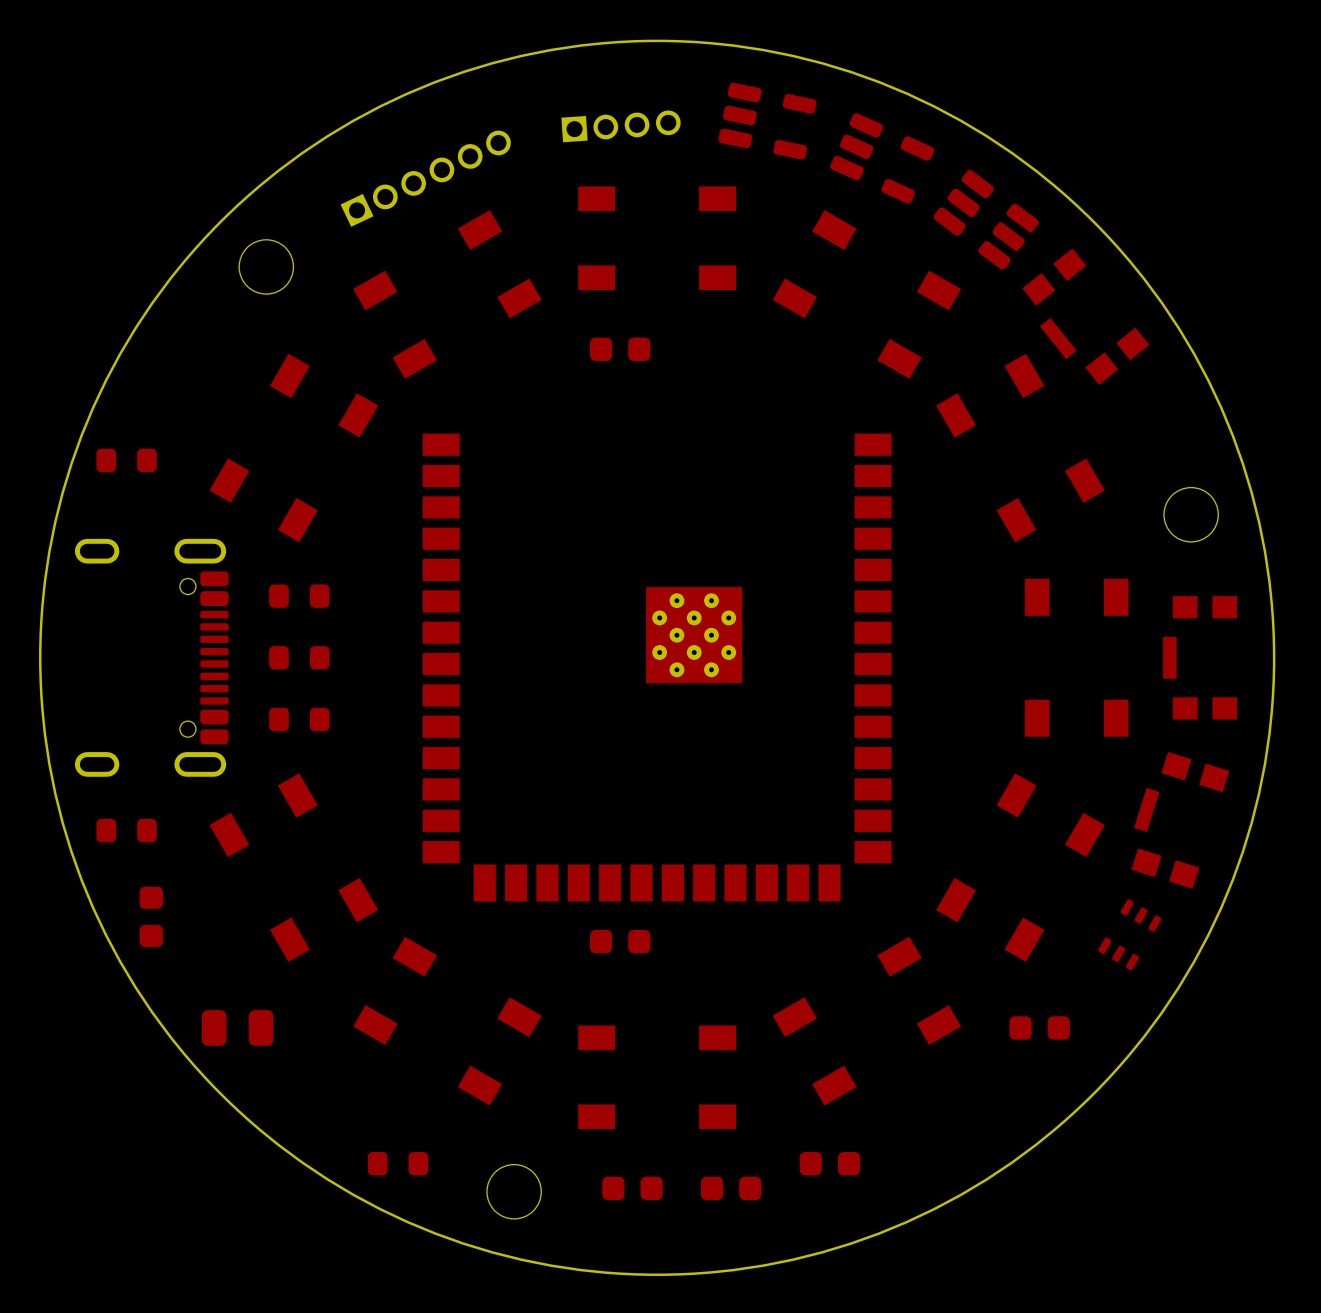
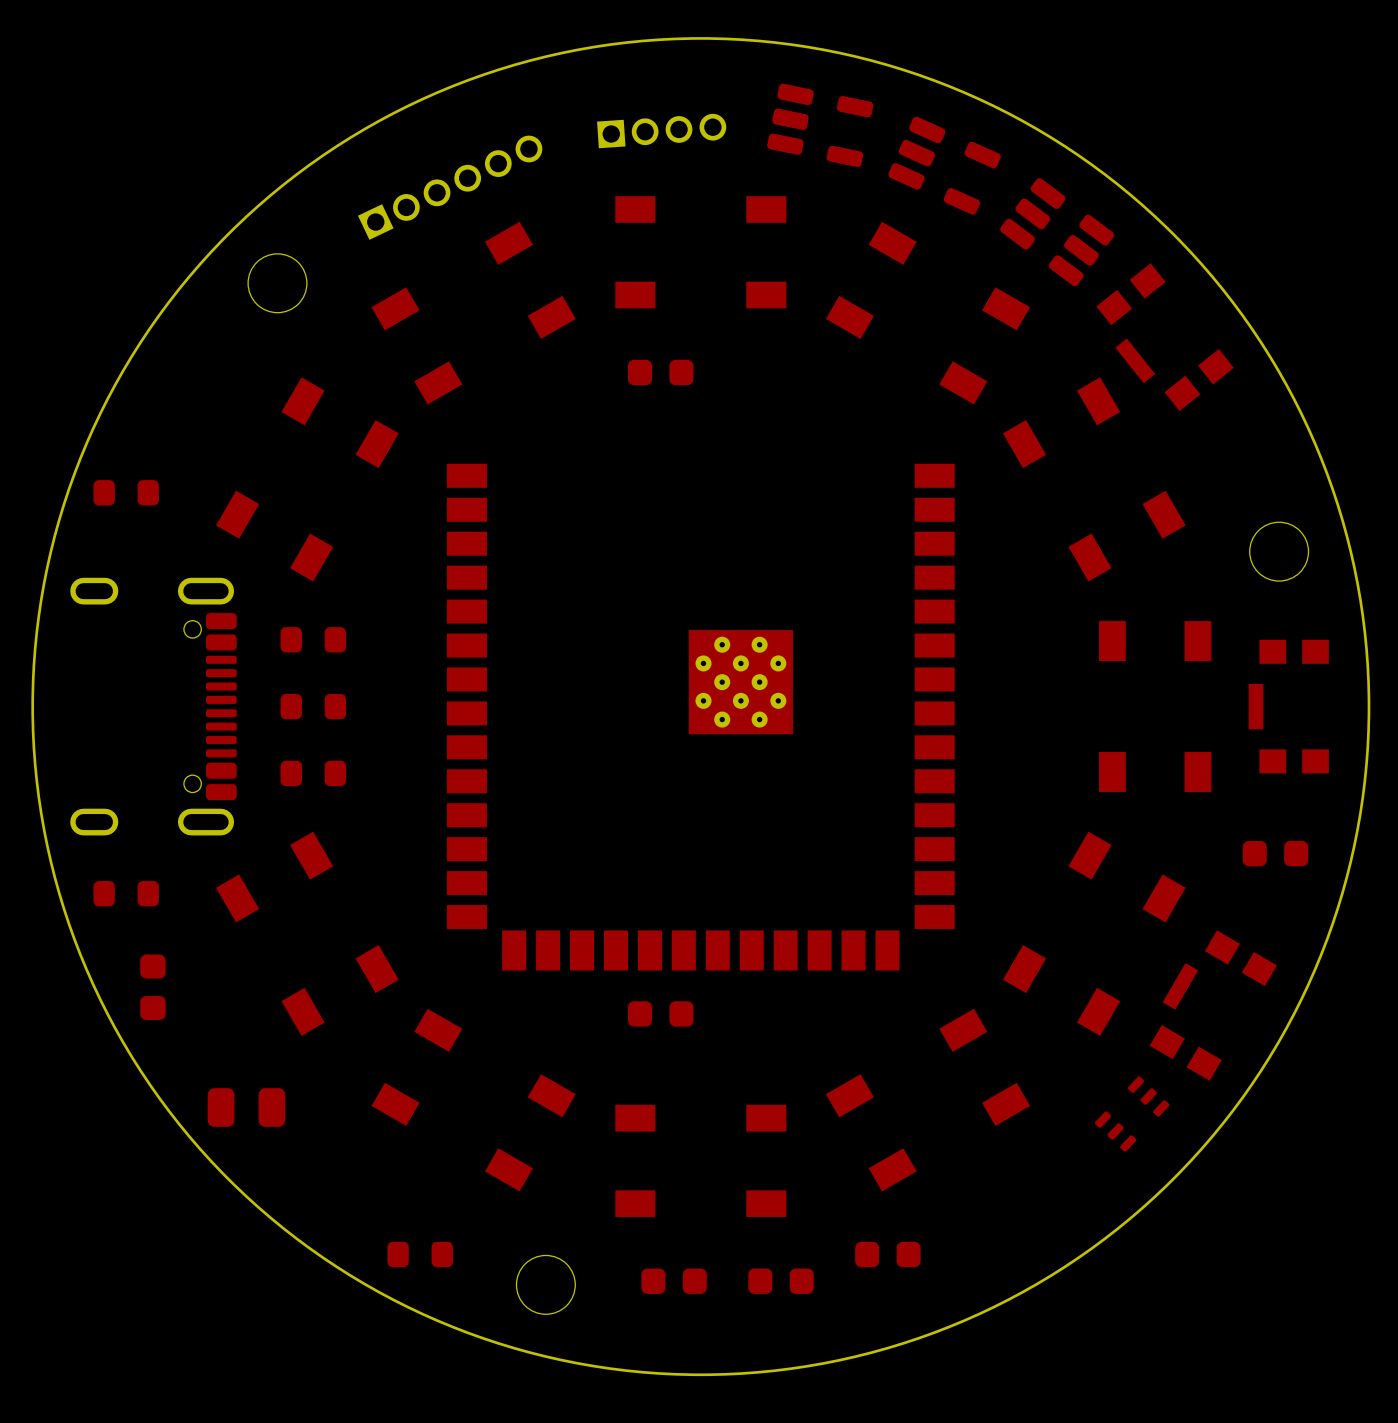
part: none -> (1275, 853)
part: (1180, 820) -> none
part footprint: [1098, 899, 1162, 971] -> [1149, 930, 1278, 1081]
part footprint: [1009, 1016, 1070, 1040] -> [1094, 1076, 1170, 1152]

